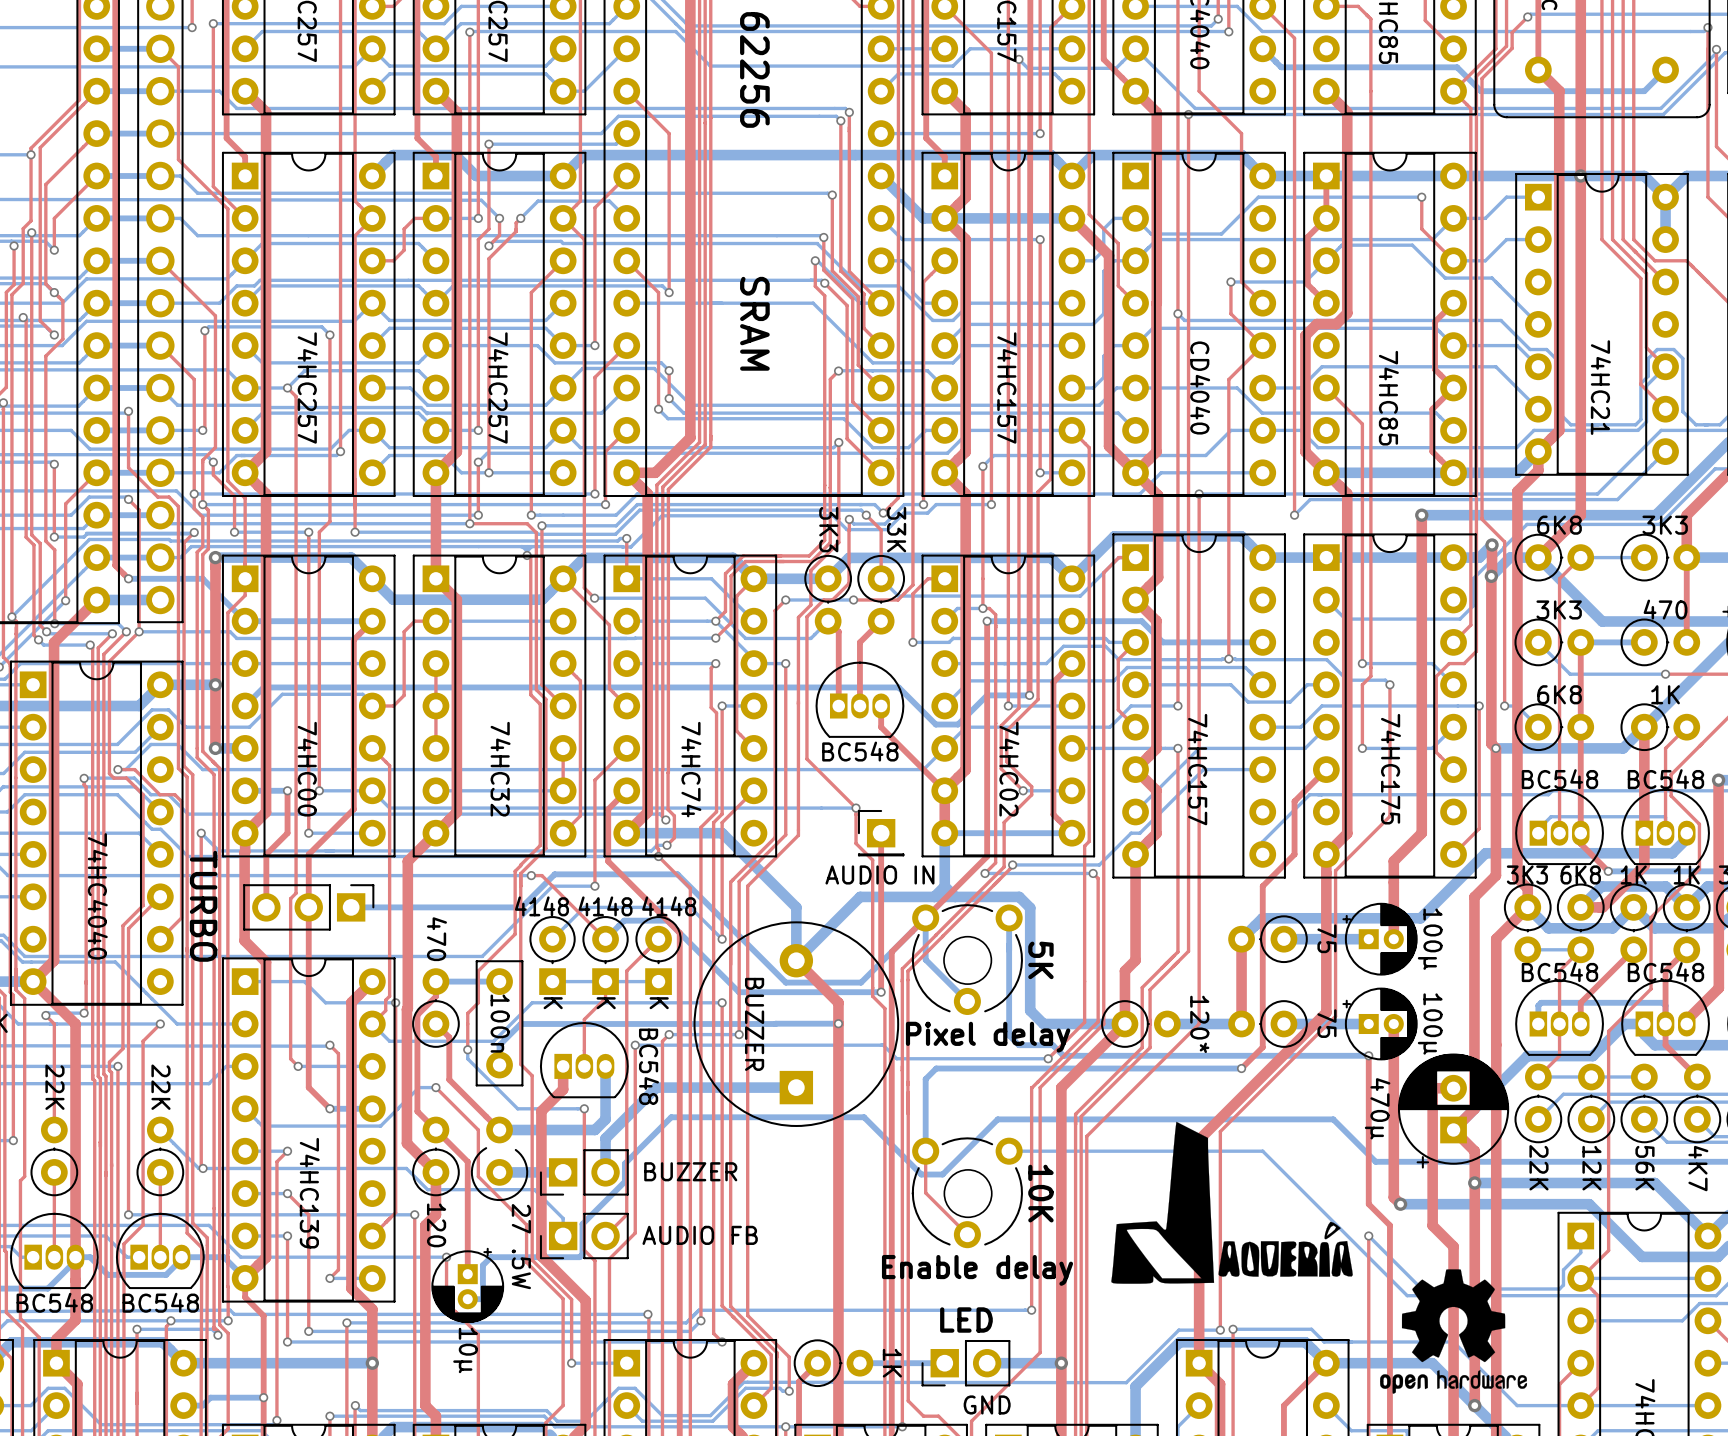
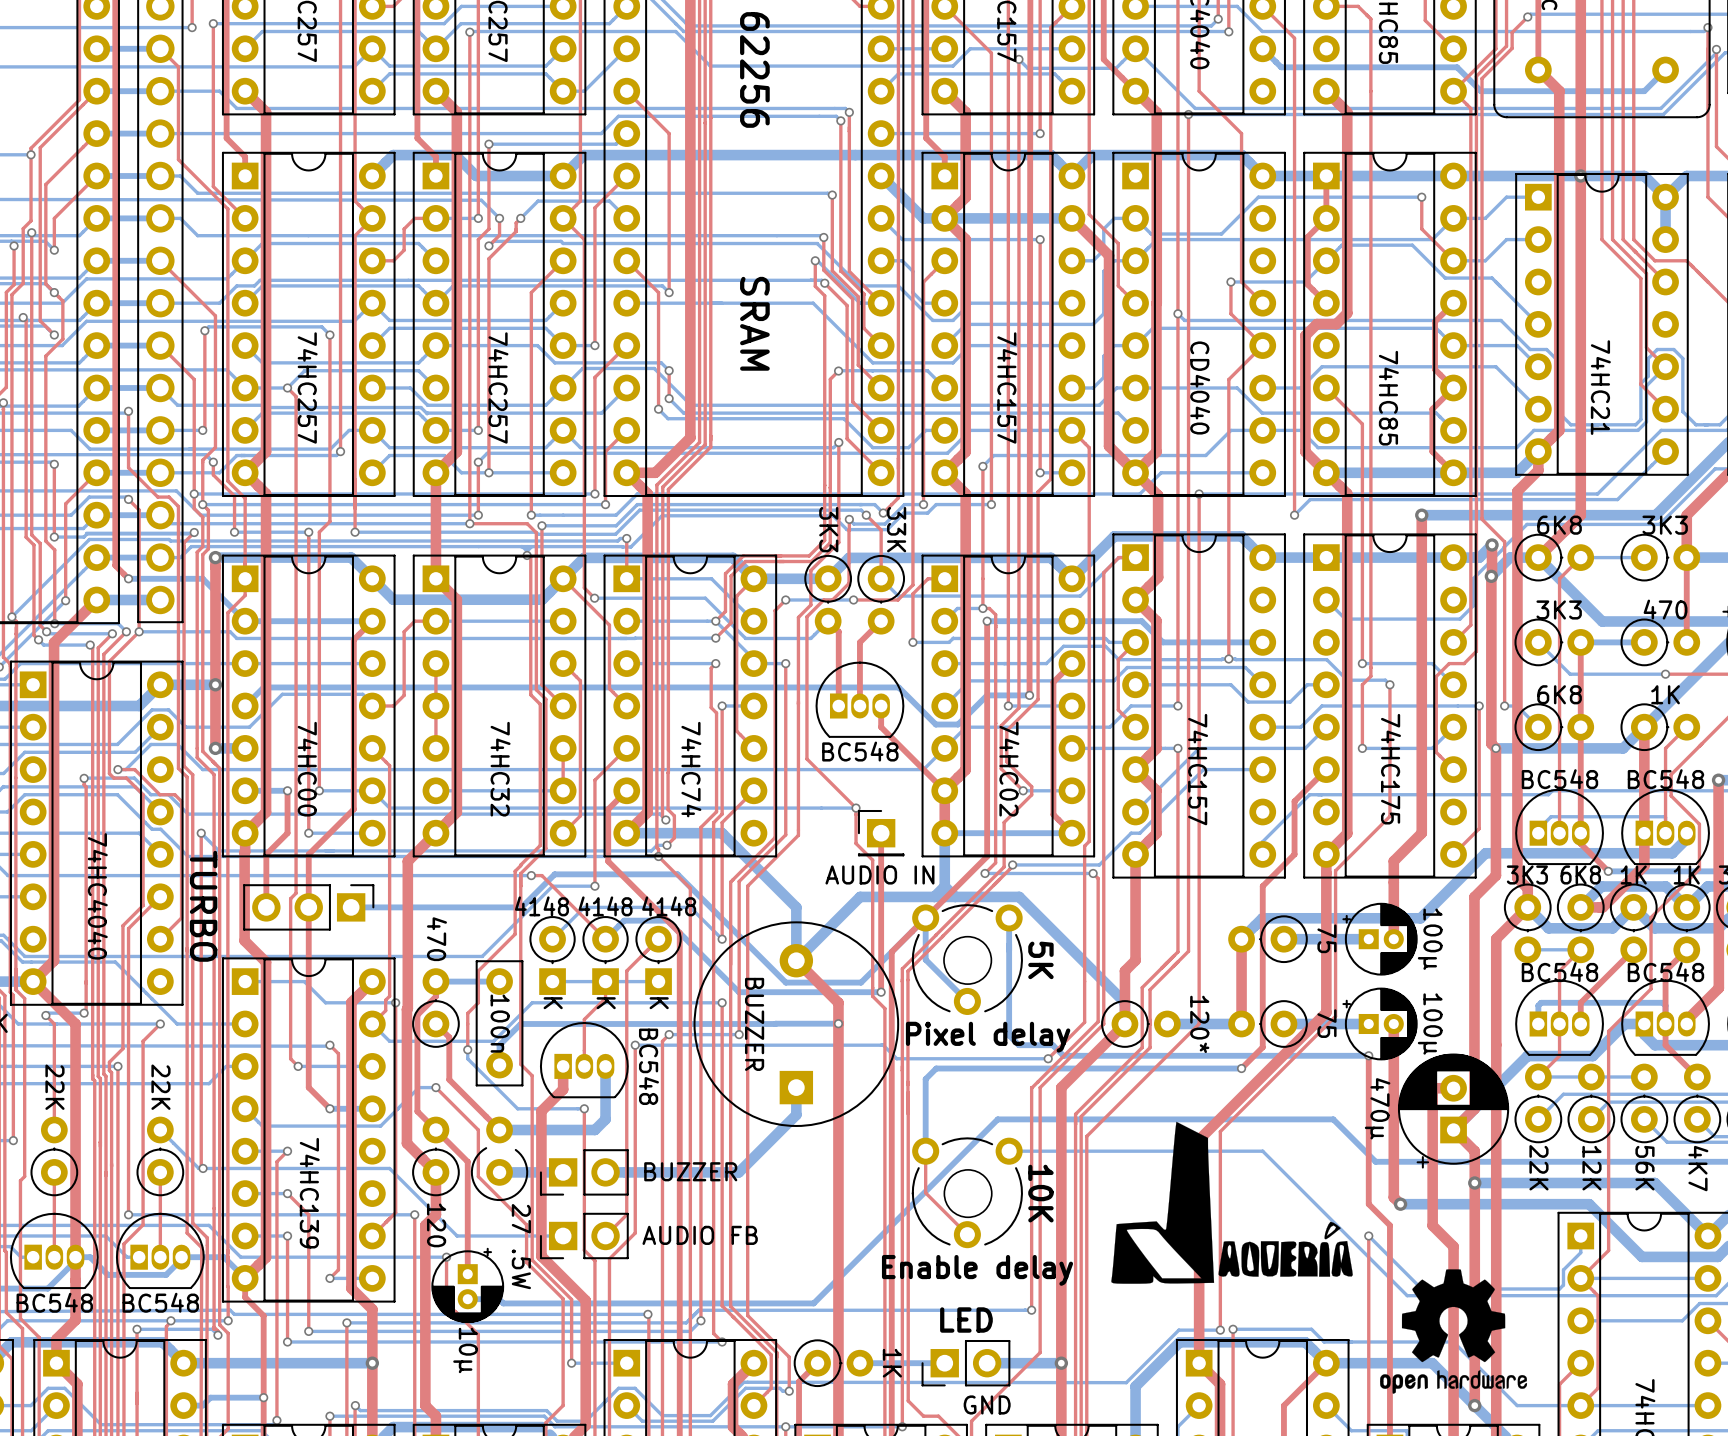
bottom track: (1030, 907) (1030, 1010) (1043, 1023) (1124, 1023) -> (1030, 907) (1124, 1002) (1124, 1023)
bottom track: (796, 1087) (656, 1087) (605, 1138) (605, 1172) -> (796, 1087) (796, 1114) (738, 1172) (605, 1172)
bottom track: (389, 1168) (406, 1168) (427, 1189) (534, 1189) (563, 1218) (563, 1235) -> (389, 1168) (457, 1235) (563, 1235)
bottom track: (942, 1174) (921, 1174) (864, 1117) (671, 1117) (624, 1163) (624, 1181) (582, 1224) (582, 1254) (579, 1257) (491, 1257) (482, 1265) (481, 1299) -> (942, 1174) (813, 1303) (503, 1303) (499, 1299) (481, 1299)

